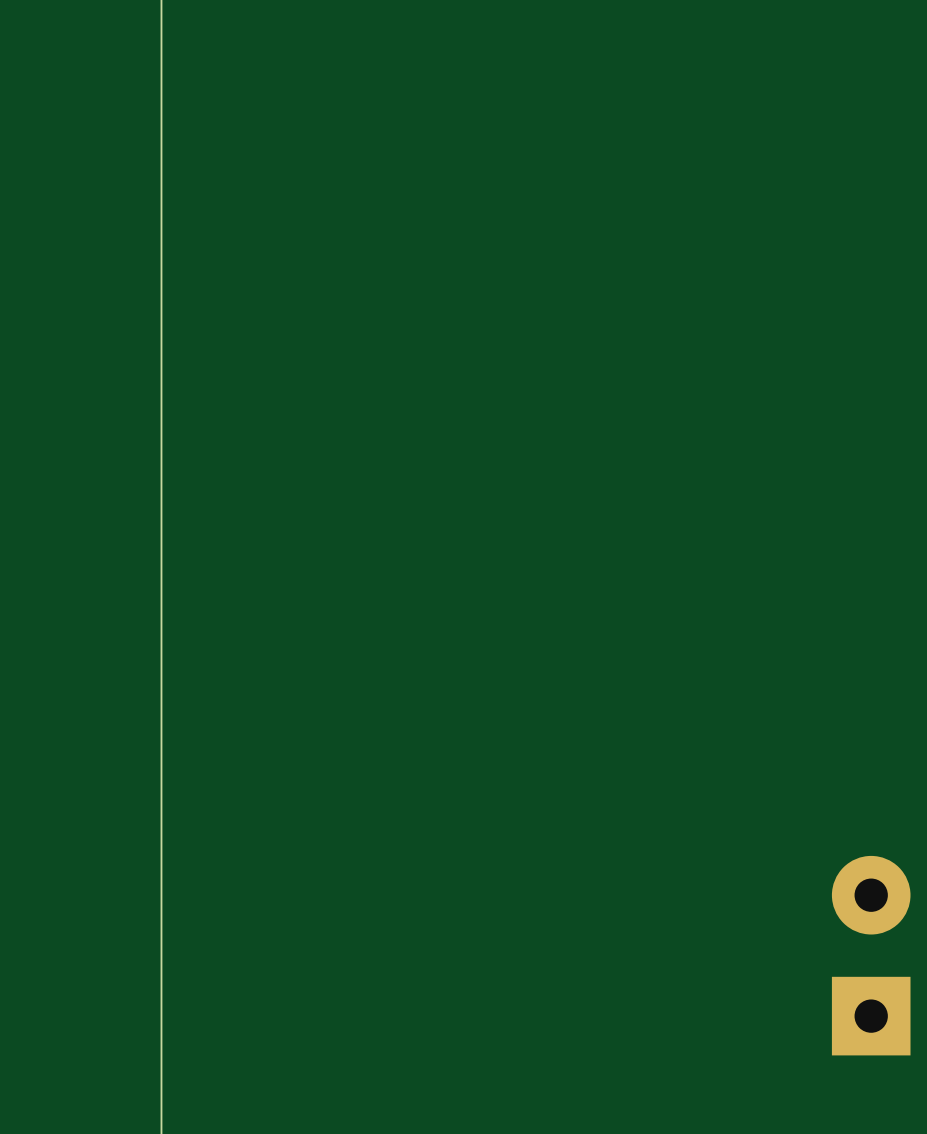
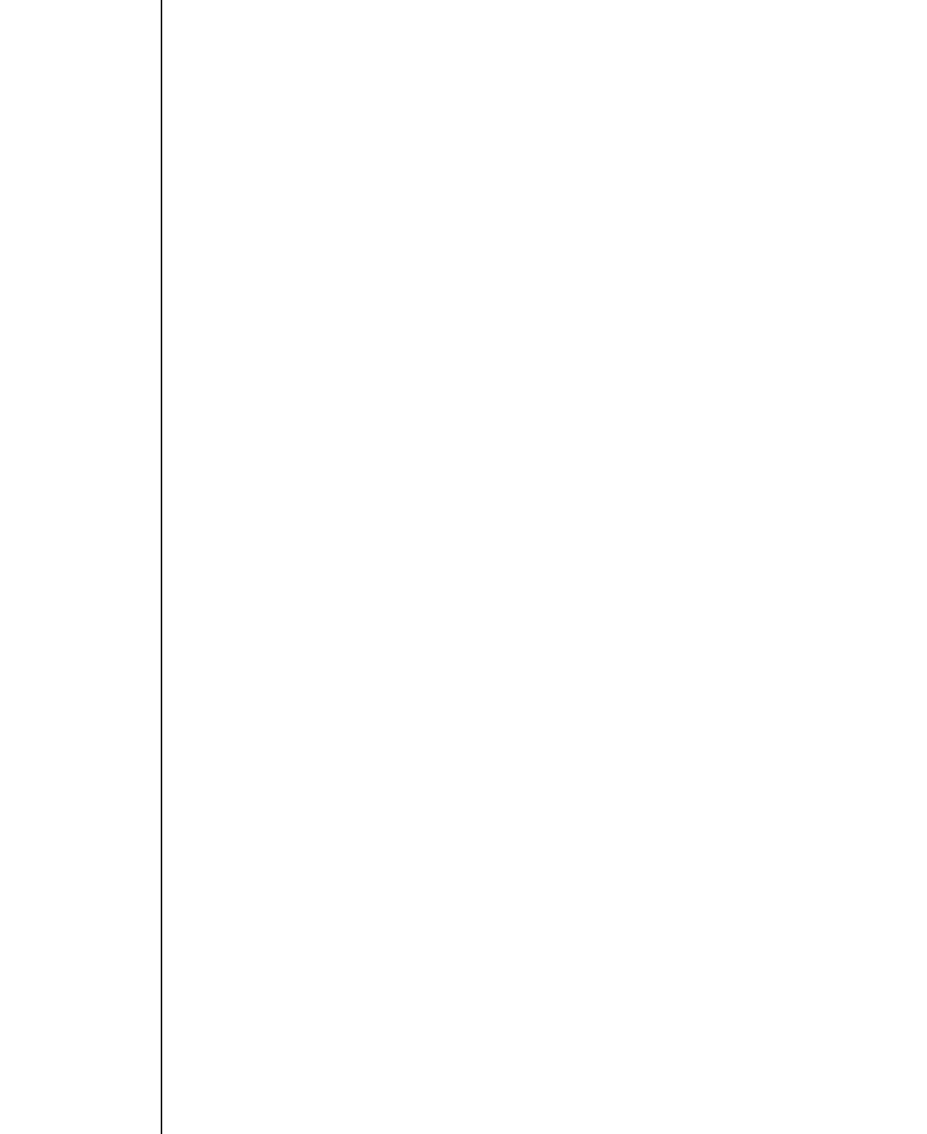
part: (871, 955) -> none

